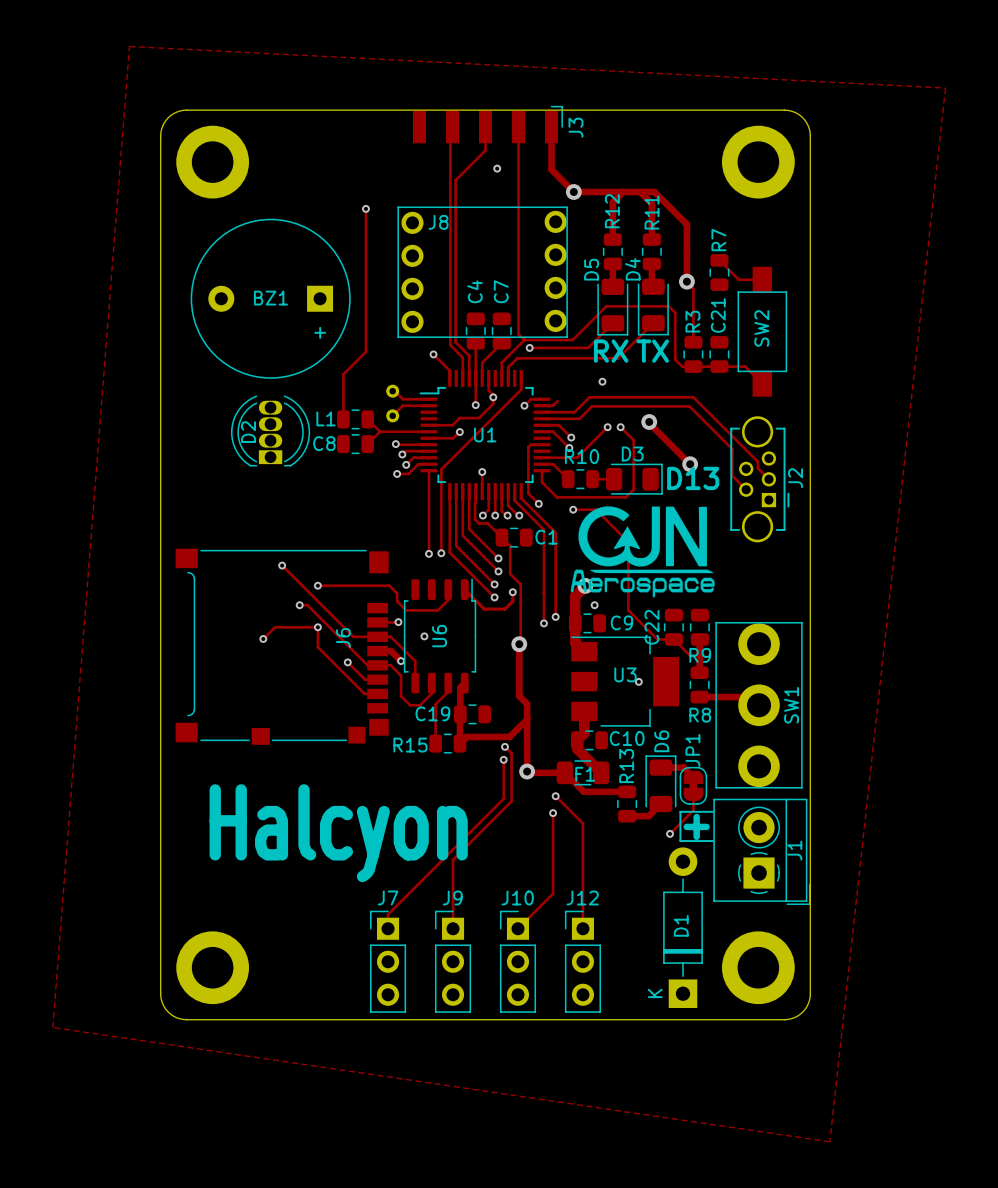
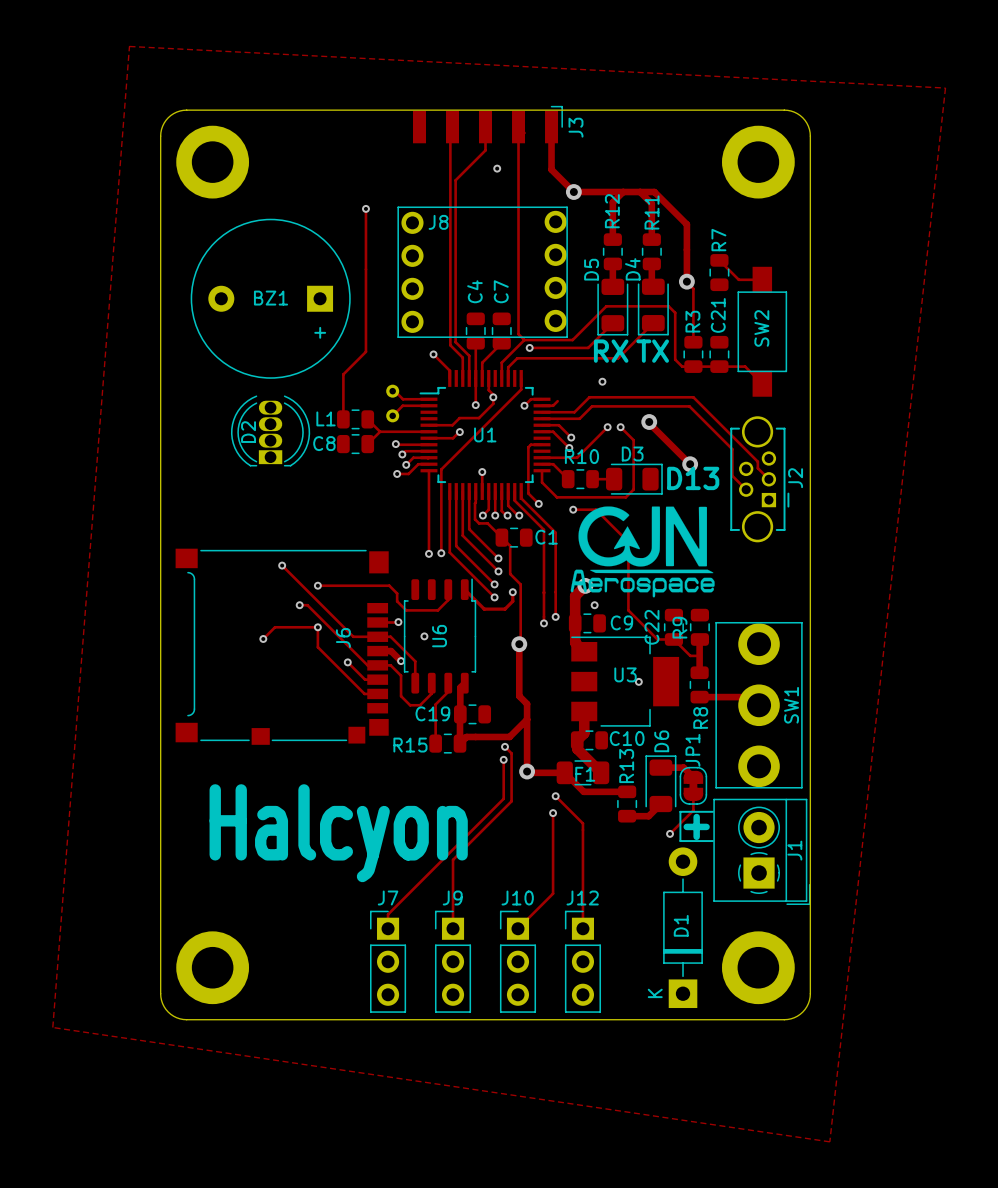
R9 name rotation: 0° (700, 655) -> 90° counterclockwise (679, 627)
R9 name position: R9 (700, 655) -> R9 (679, 627)
R8 name rotation: 0° (700, 715) -> 90° counterclockwise (700, 717)

